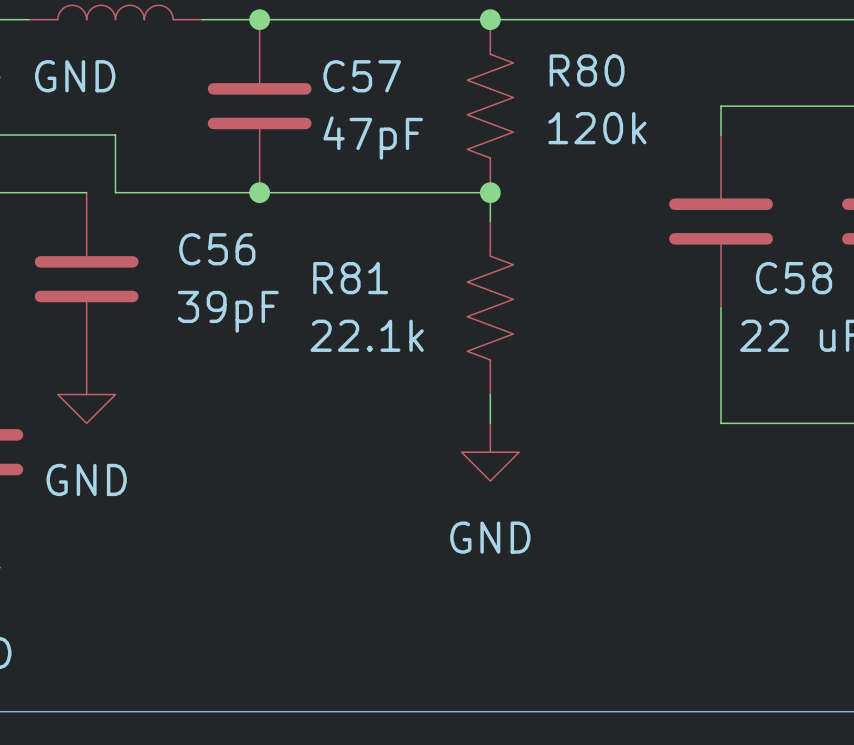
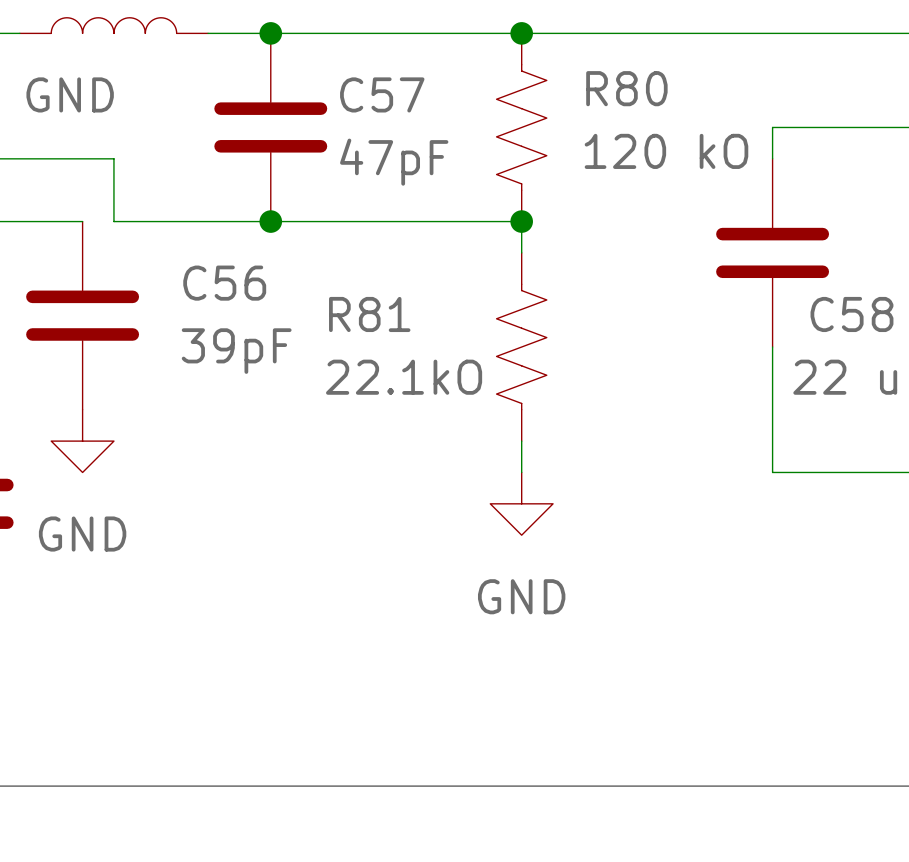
R80 value: 120k (597, 128) -> 120 kO (666, 151)
R81 value: 22.1k (367, 335) -> 22.1kO (404, 377)

